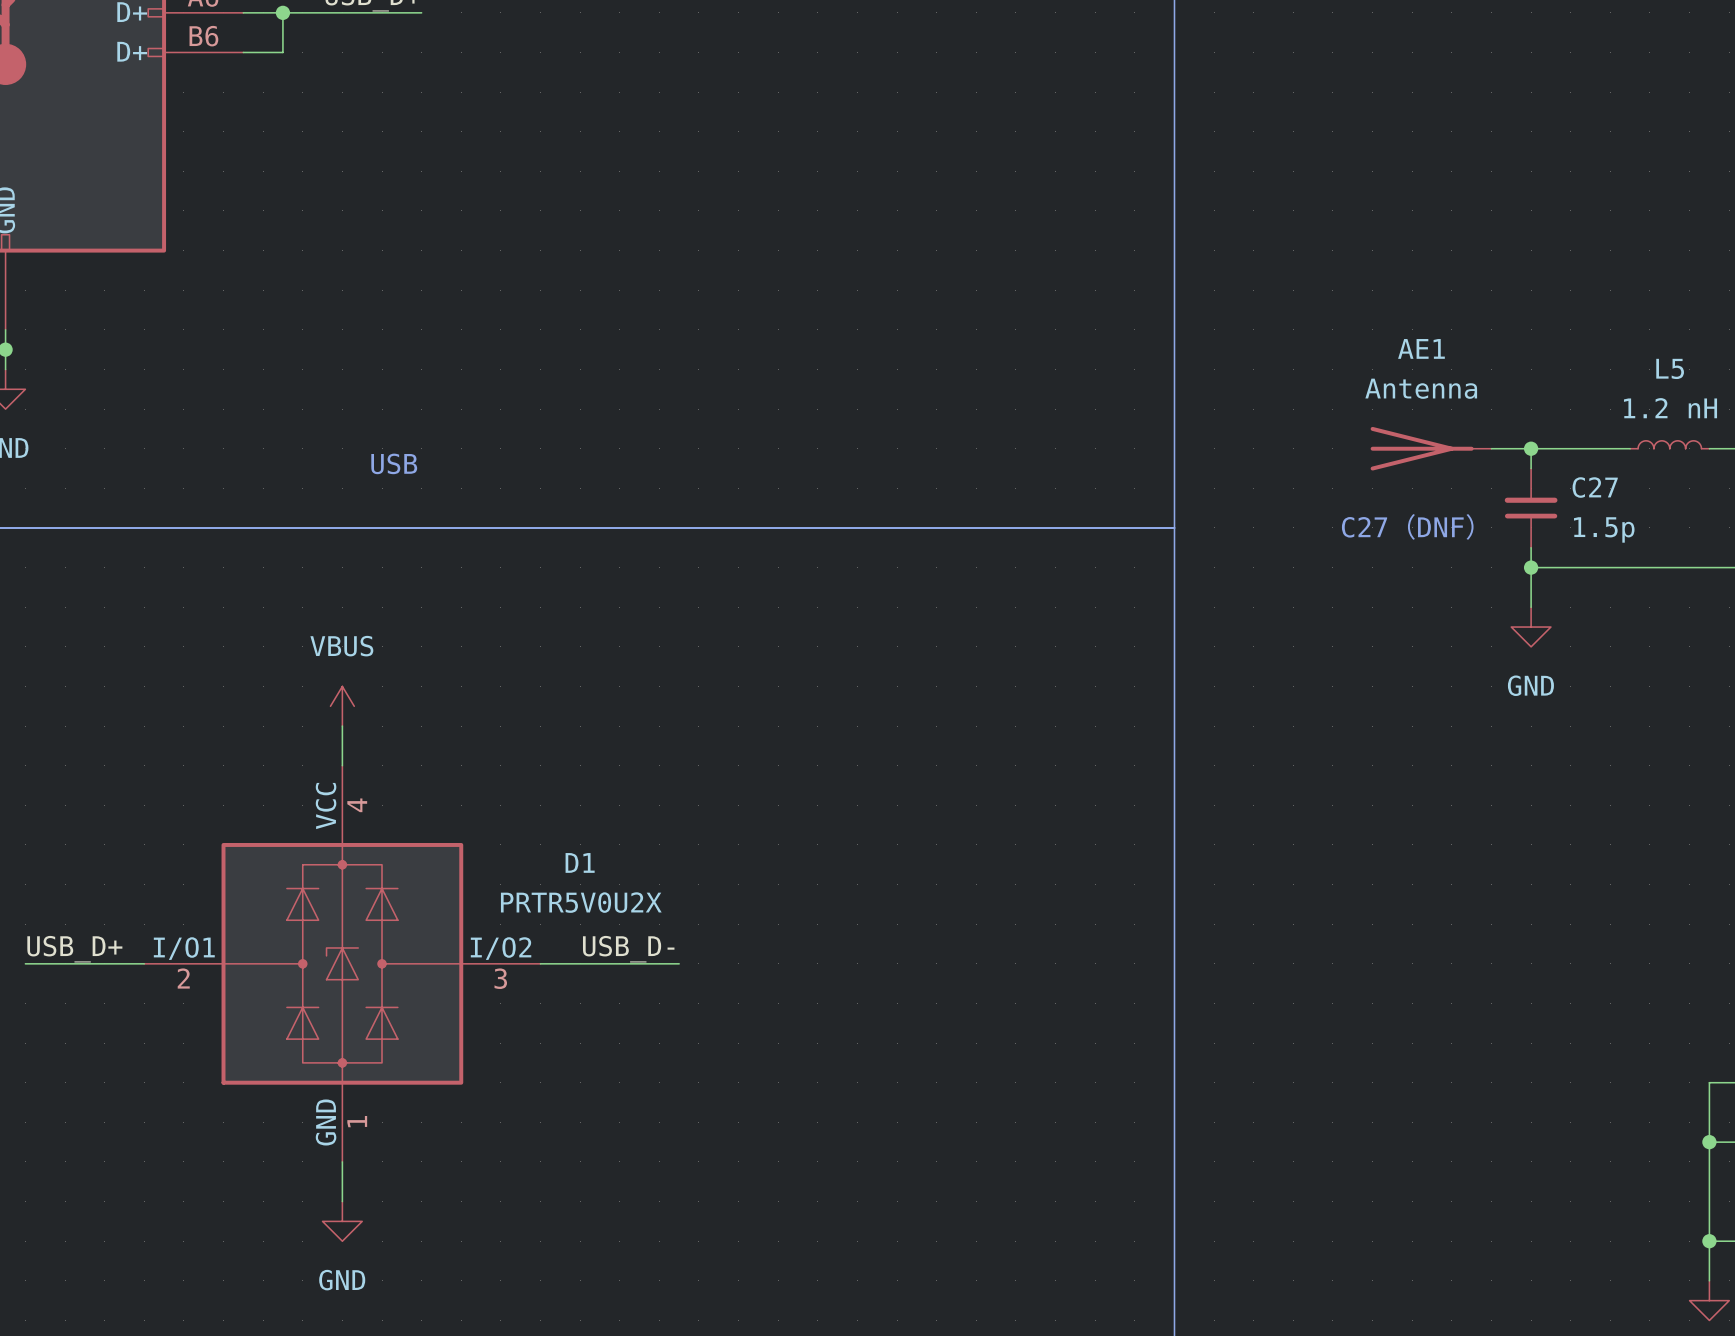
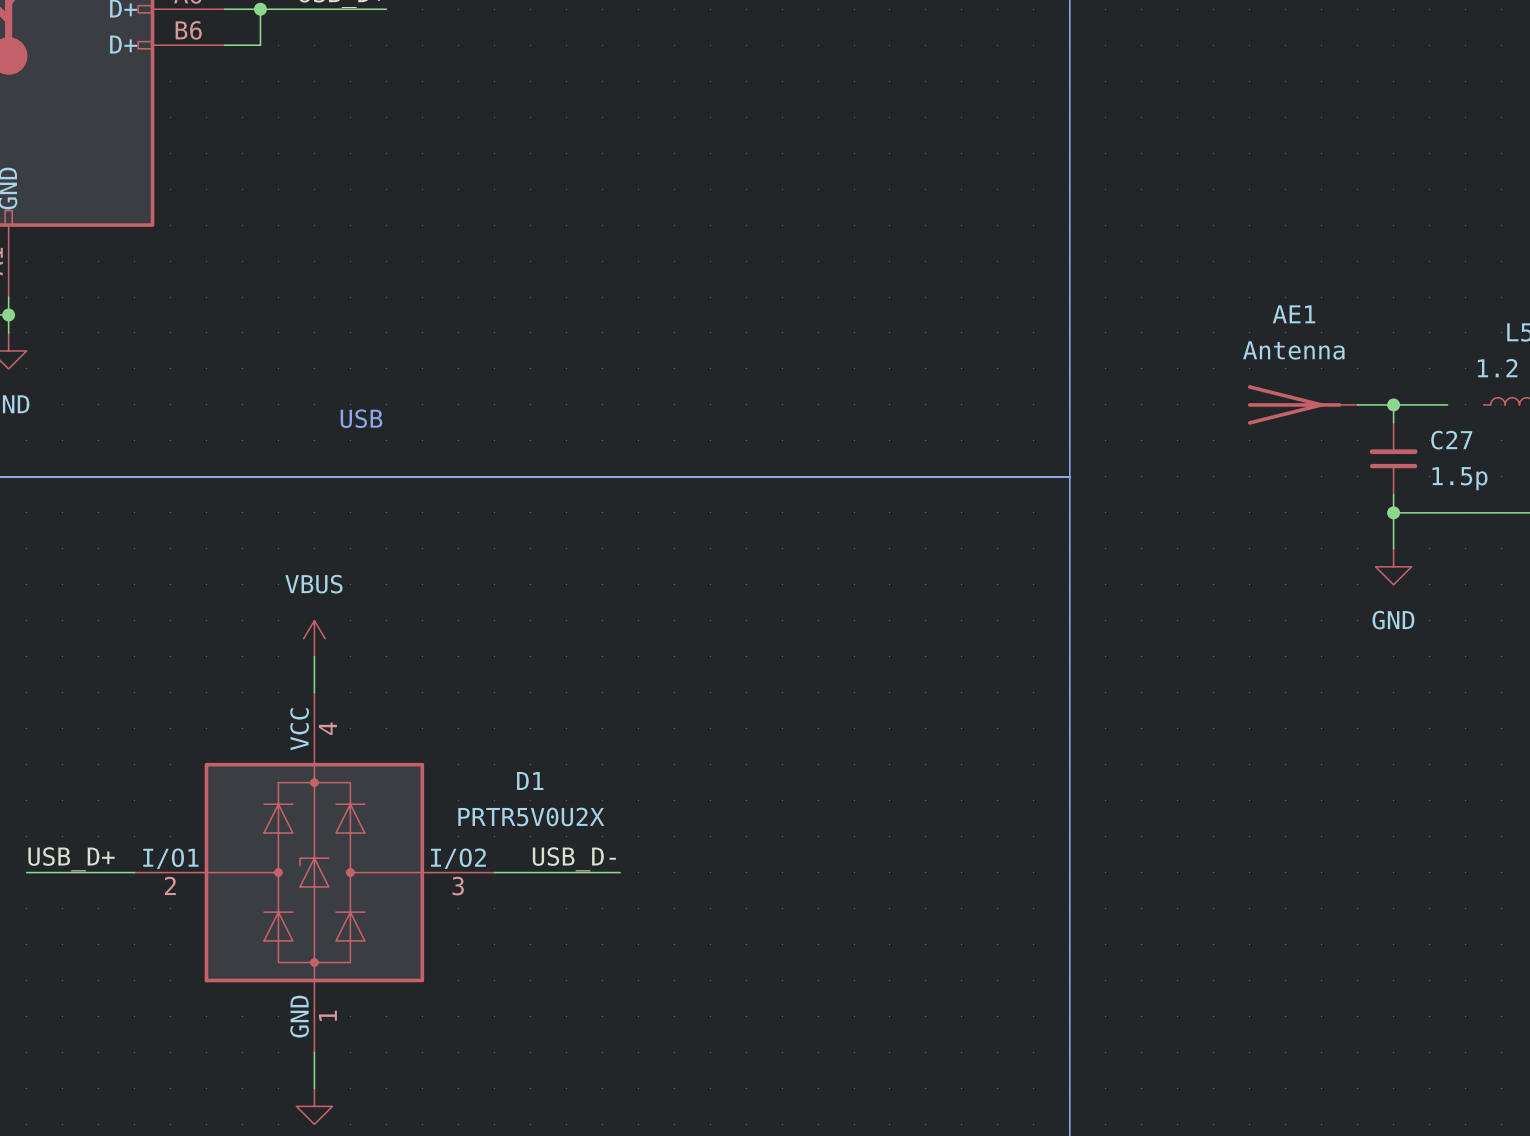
wire: (1590, 448) (1630, 448) -> none
text: C27（DNF） (1407, 526) -> none

